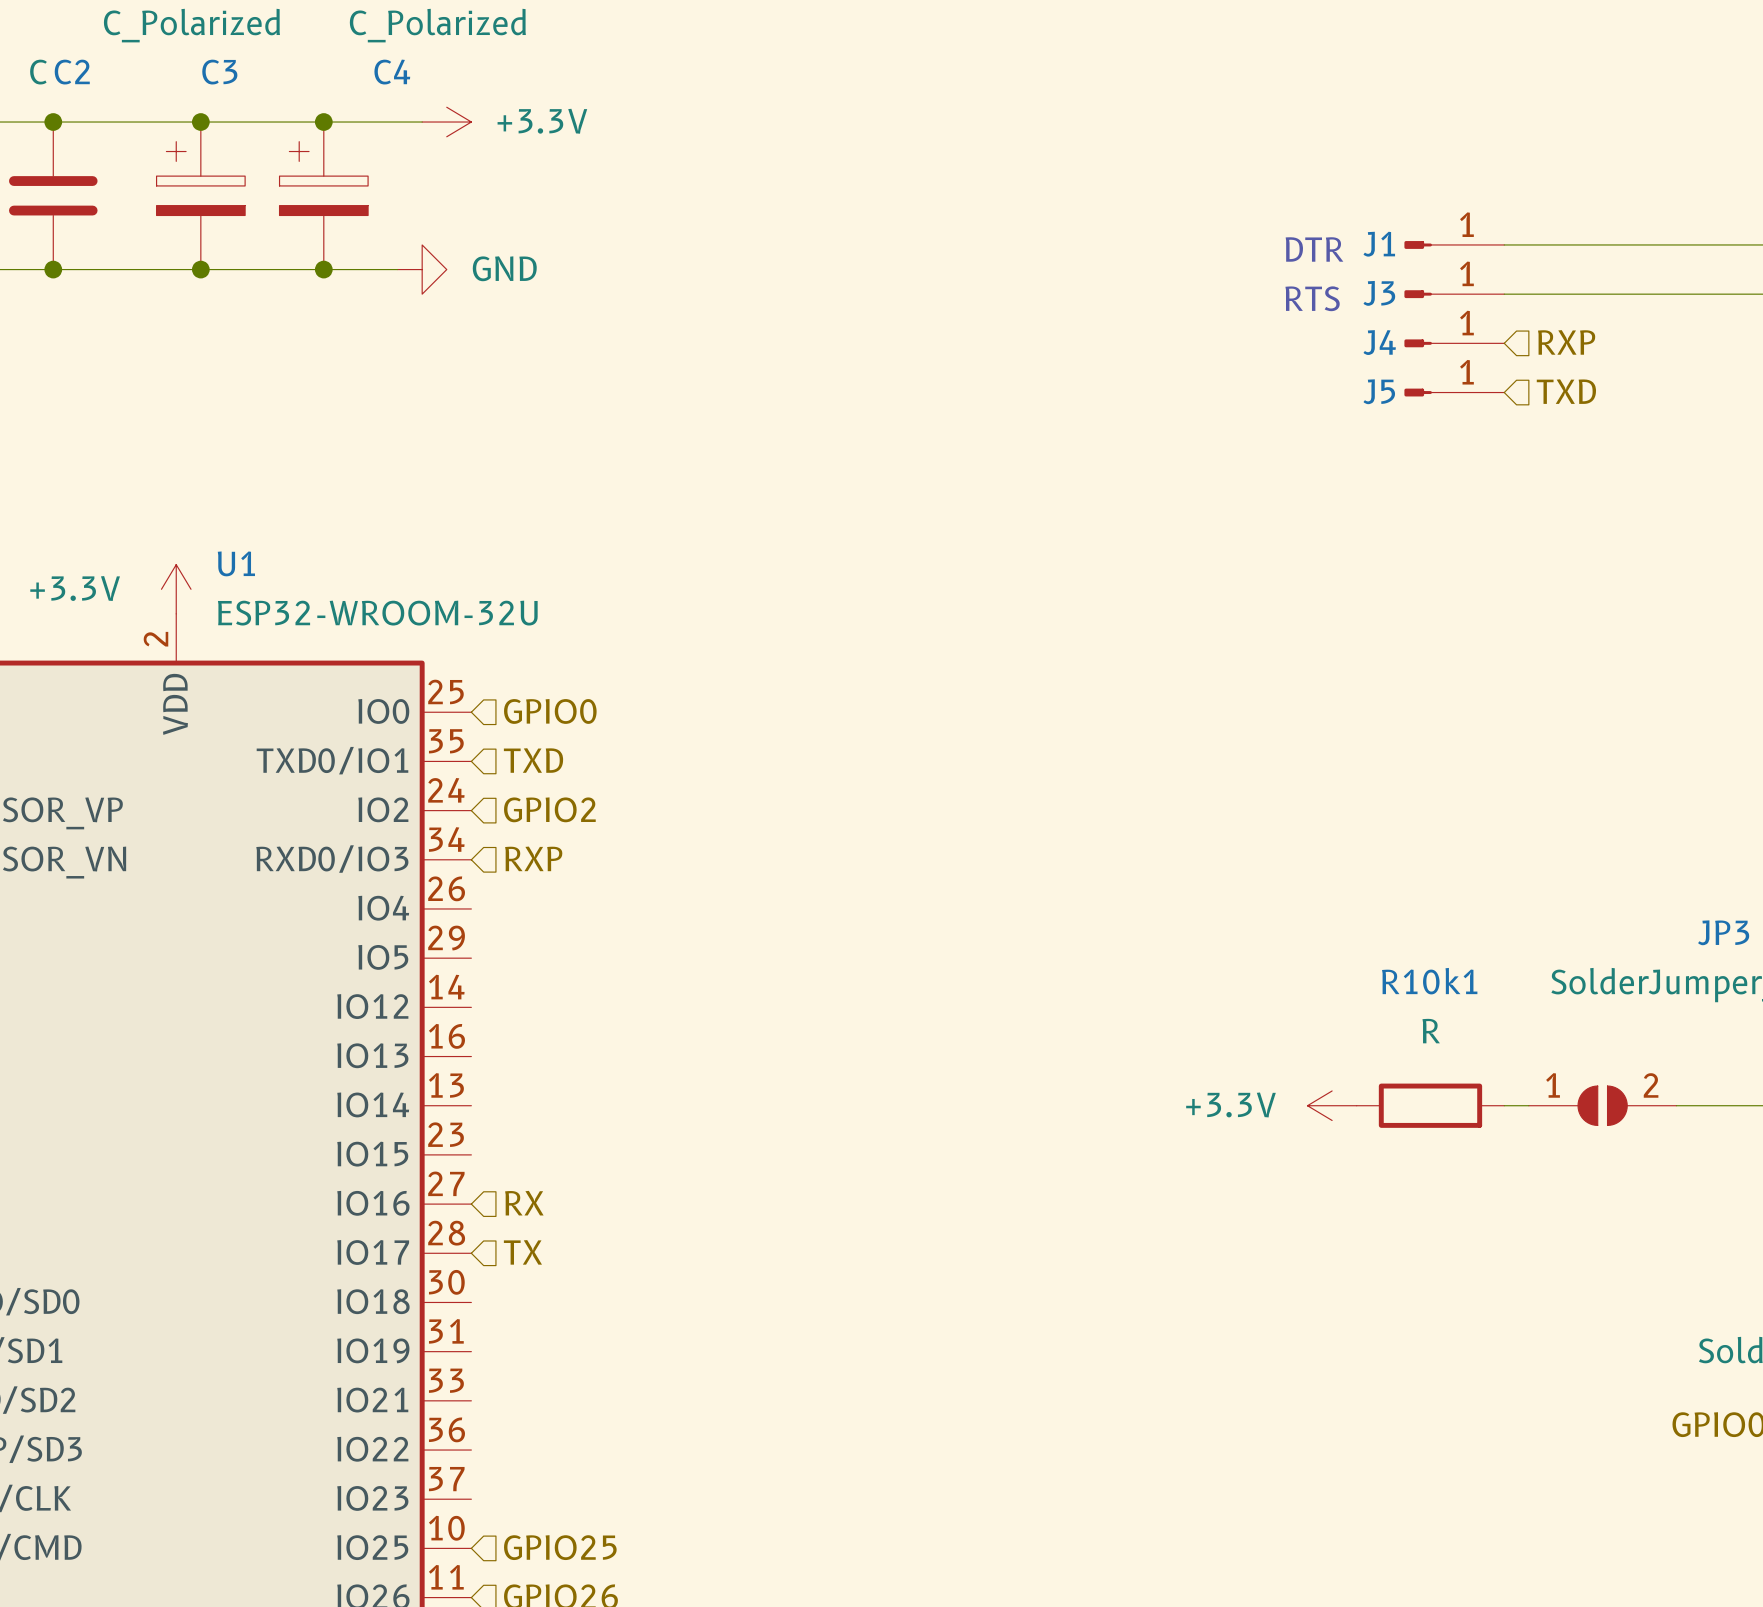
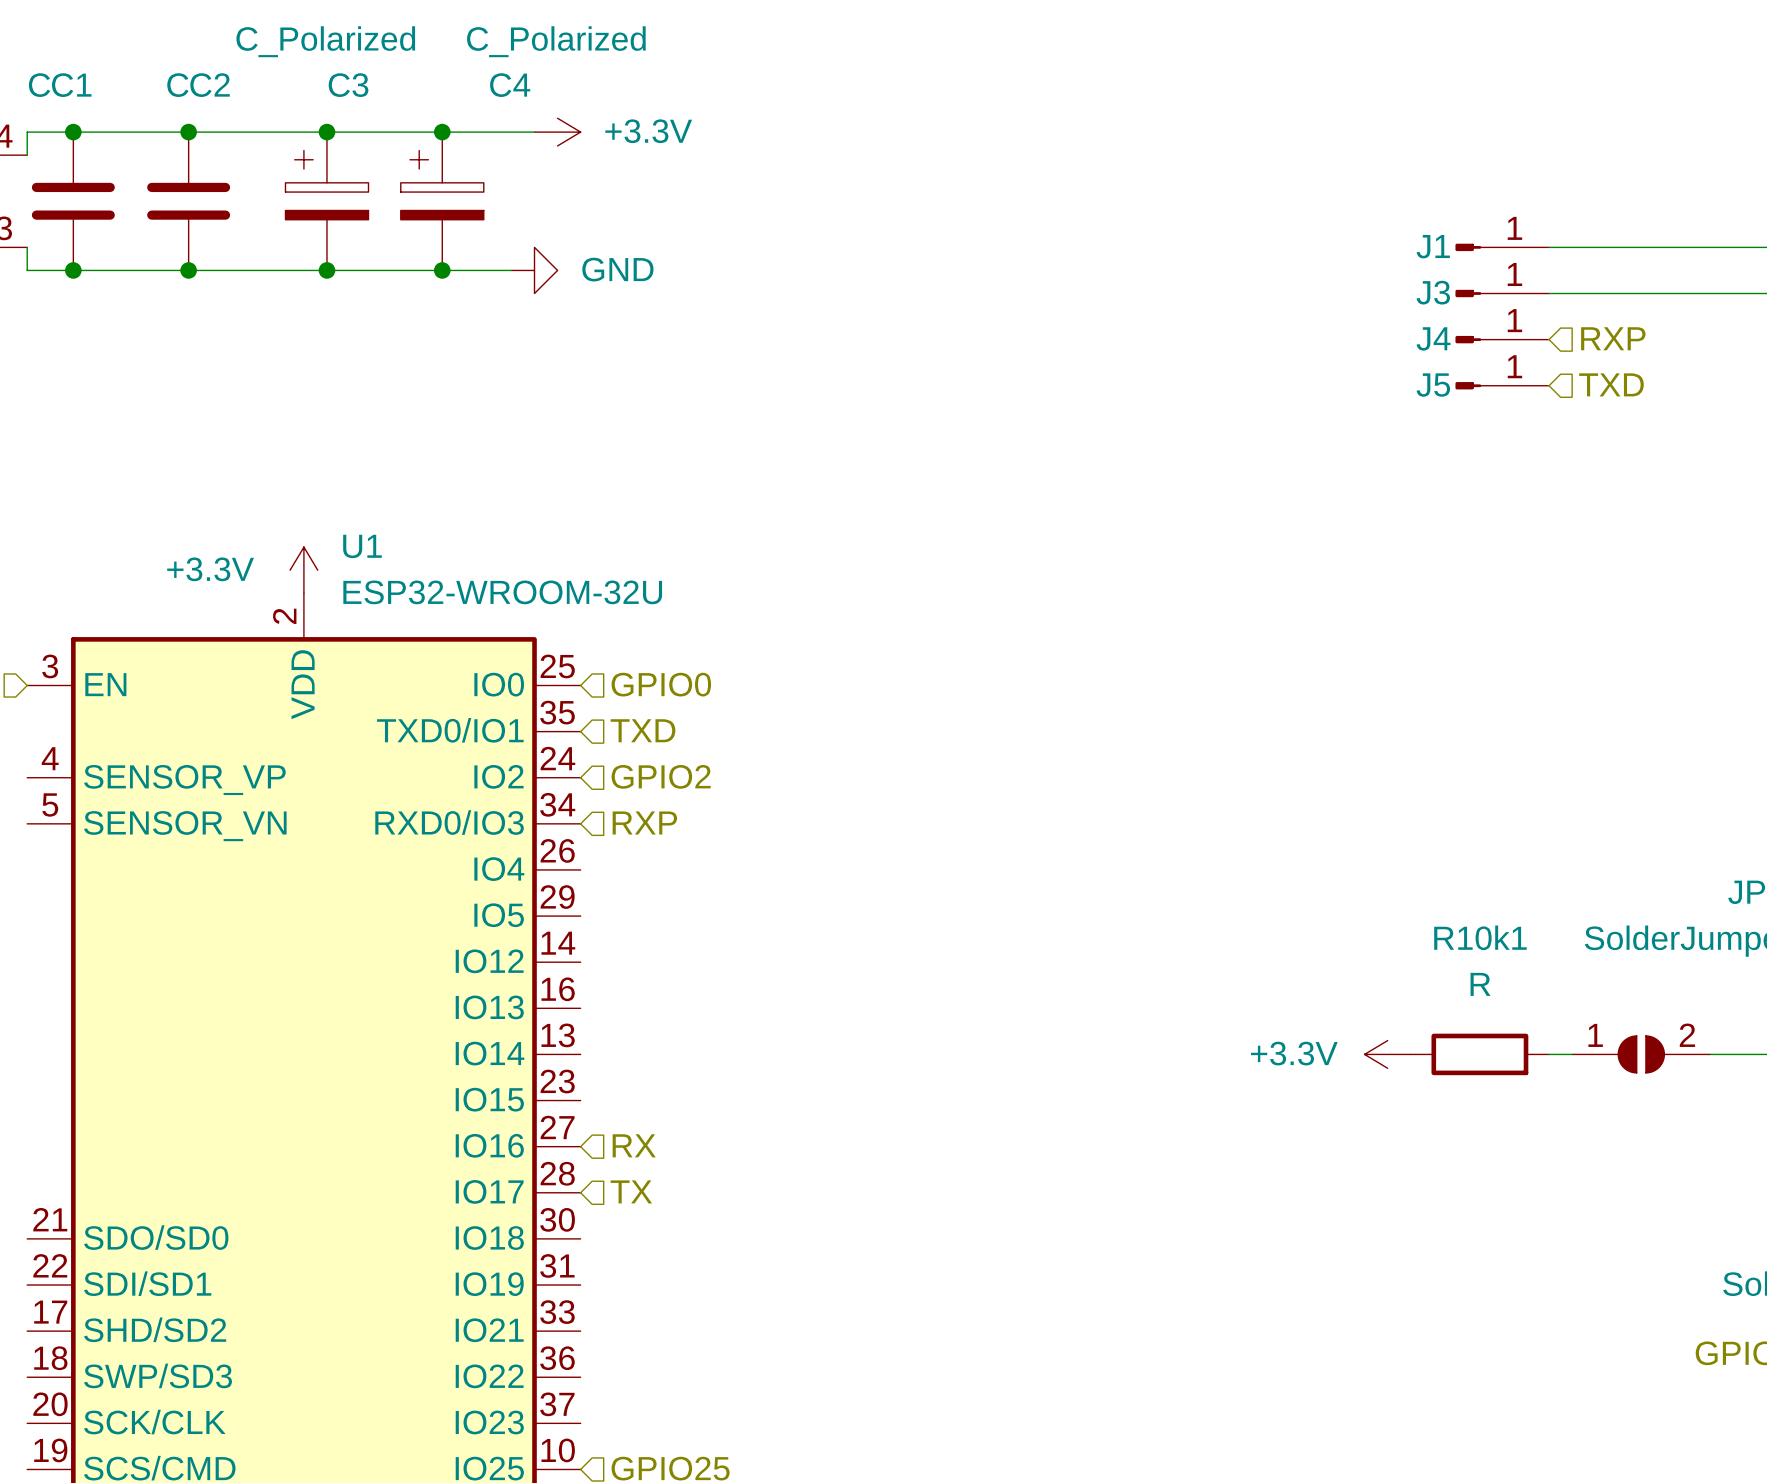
text: DTR (1314, 249) -> none
text: RTS (1312, 298) -> none

